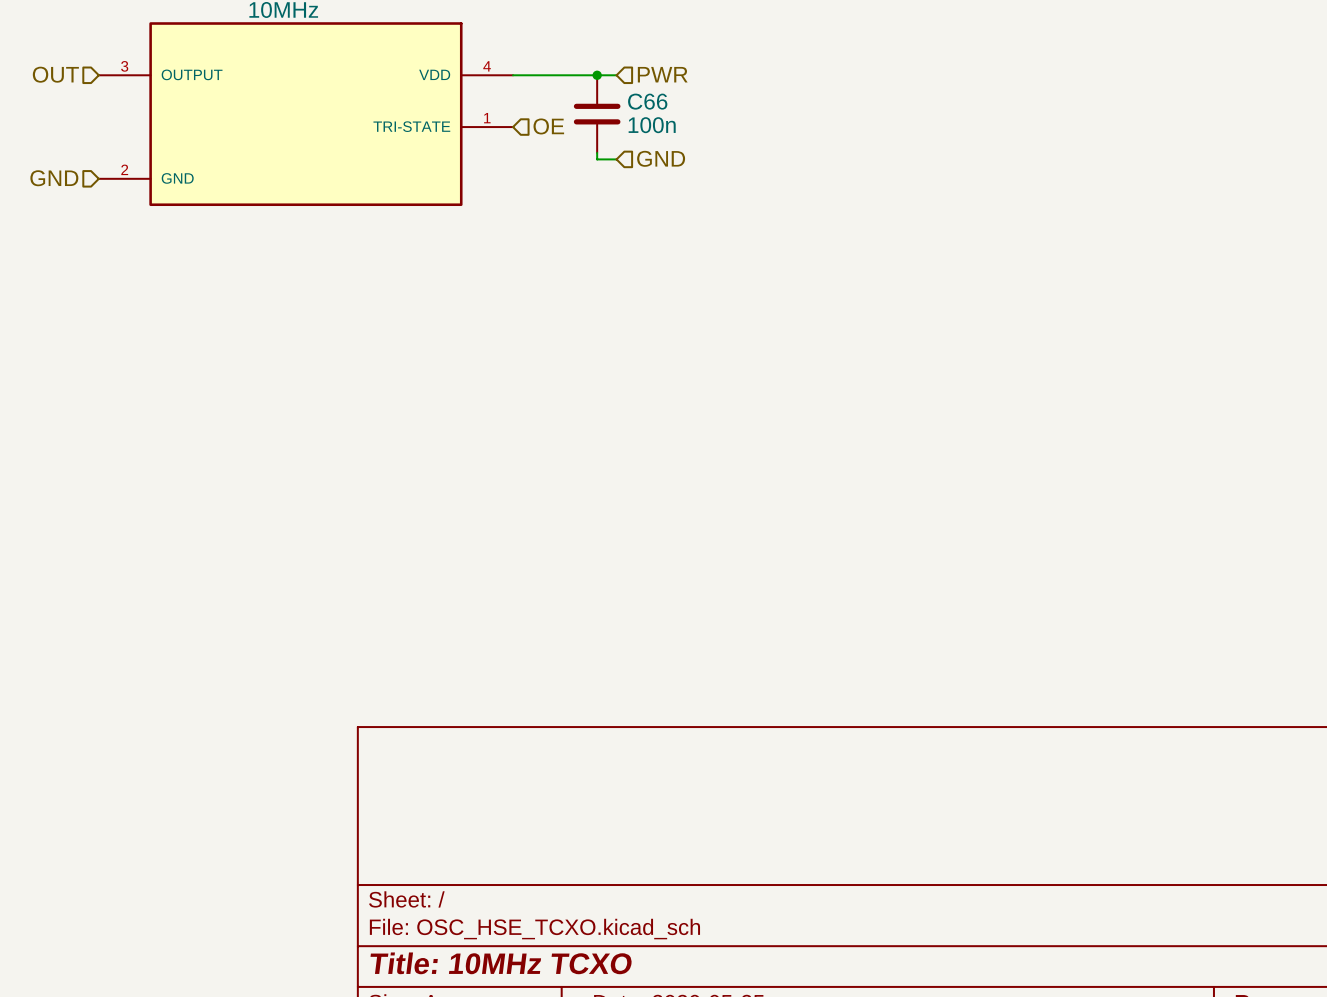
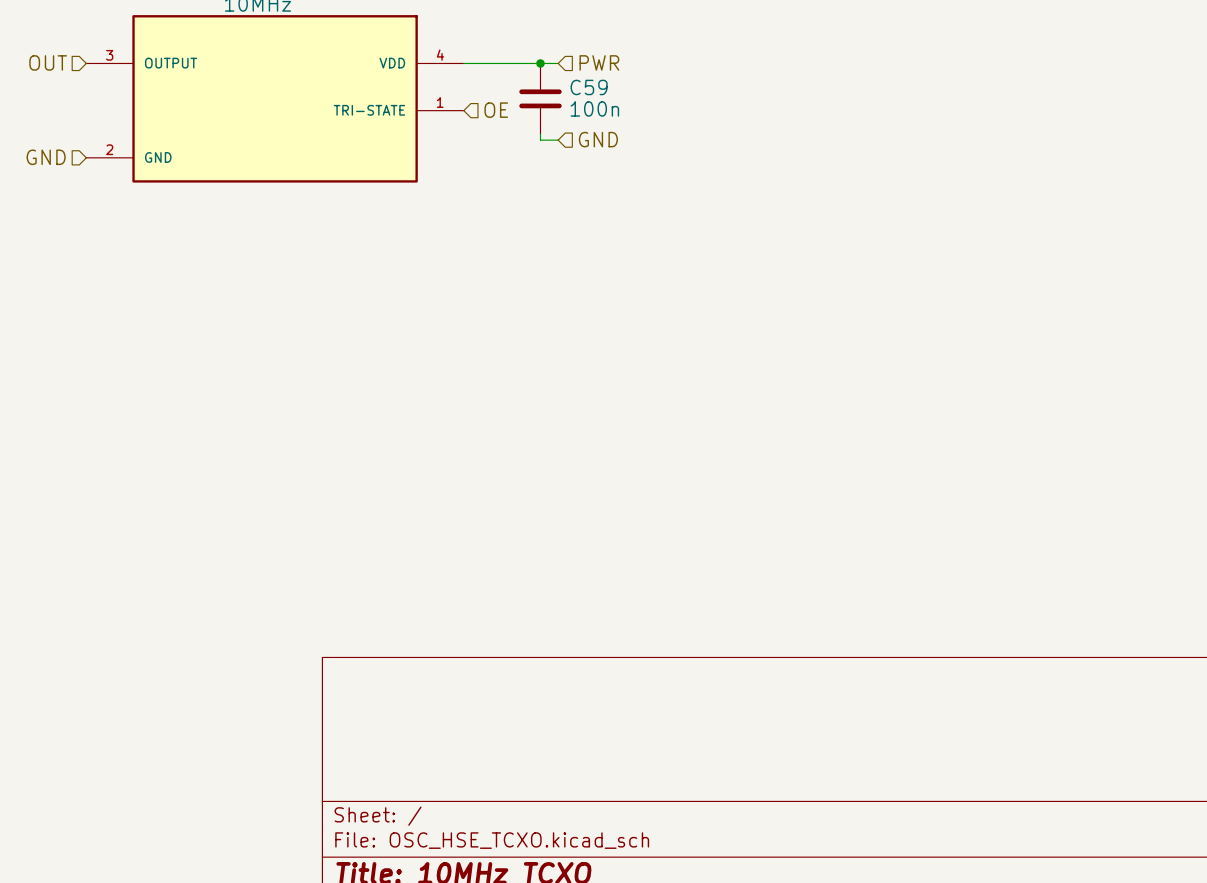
C66 name: C66 (647, 101) -> C59 (589, 87)

